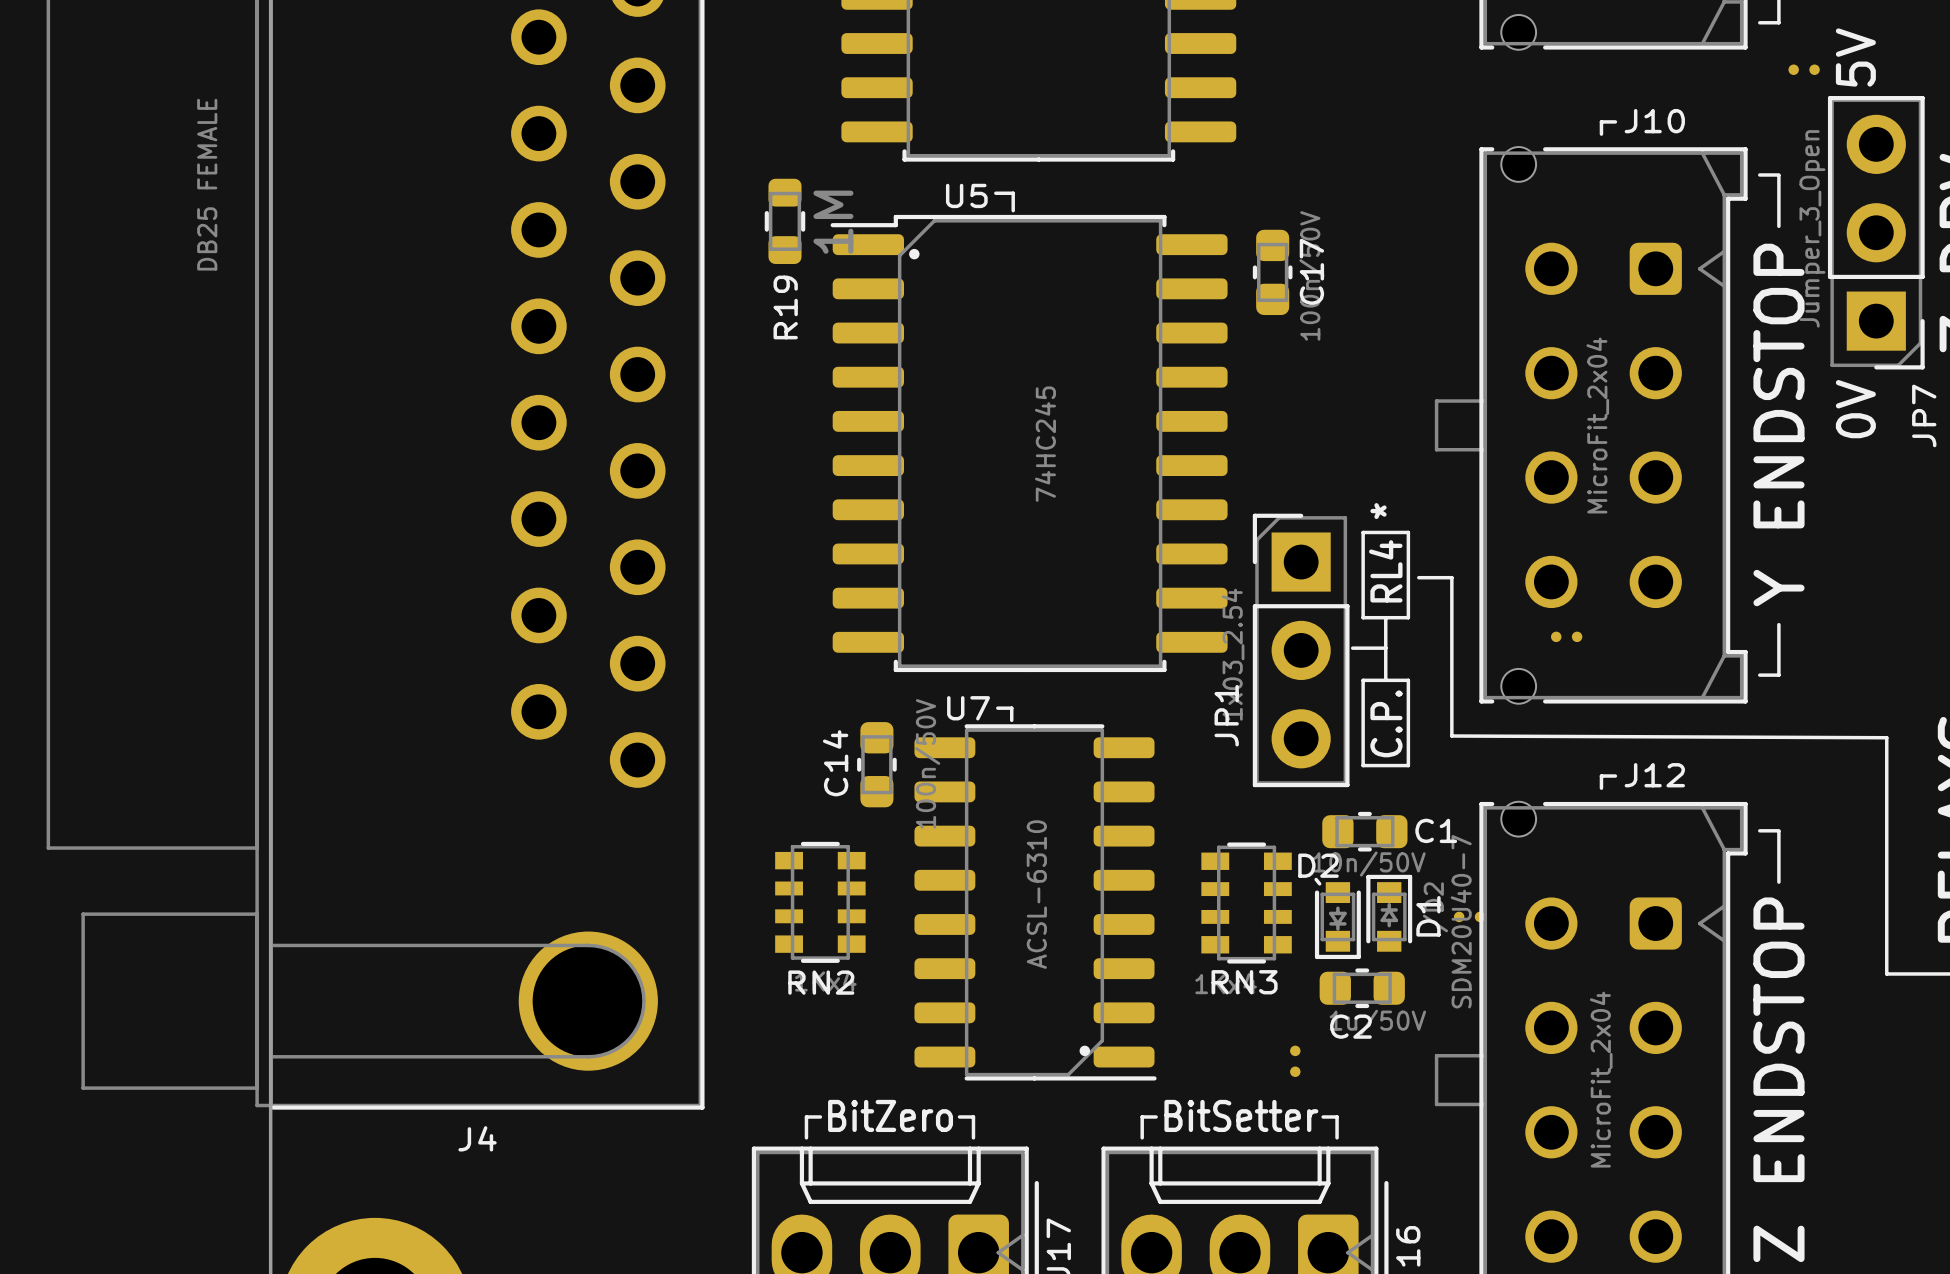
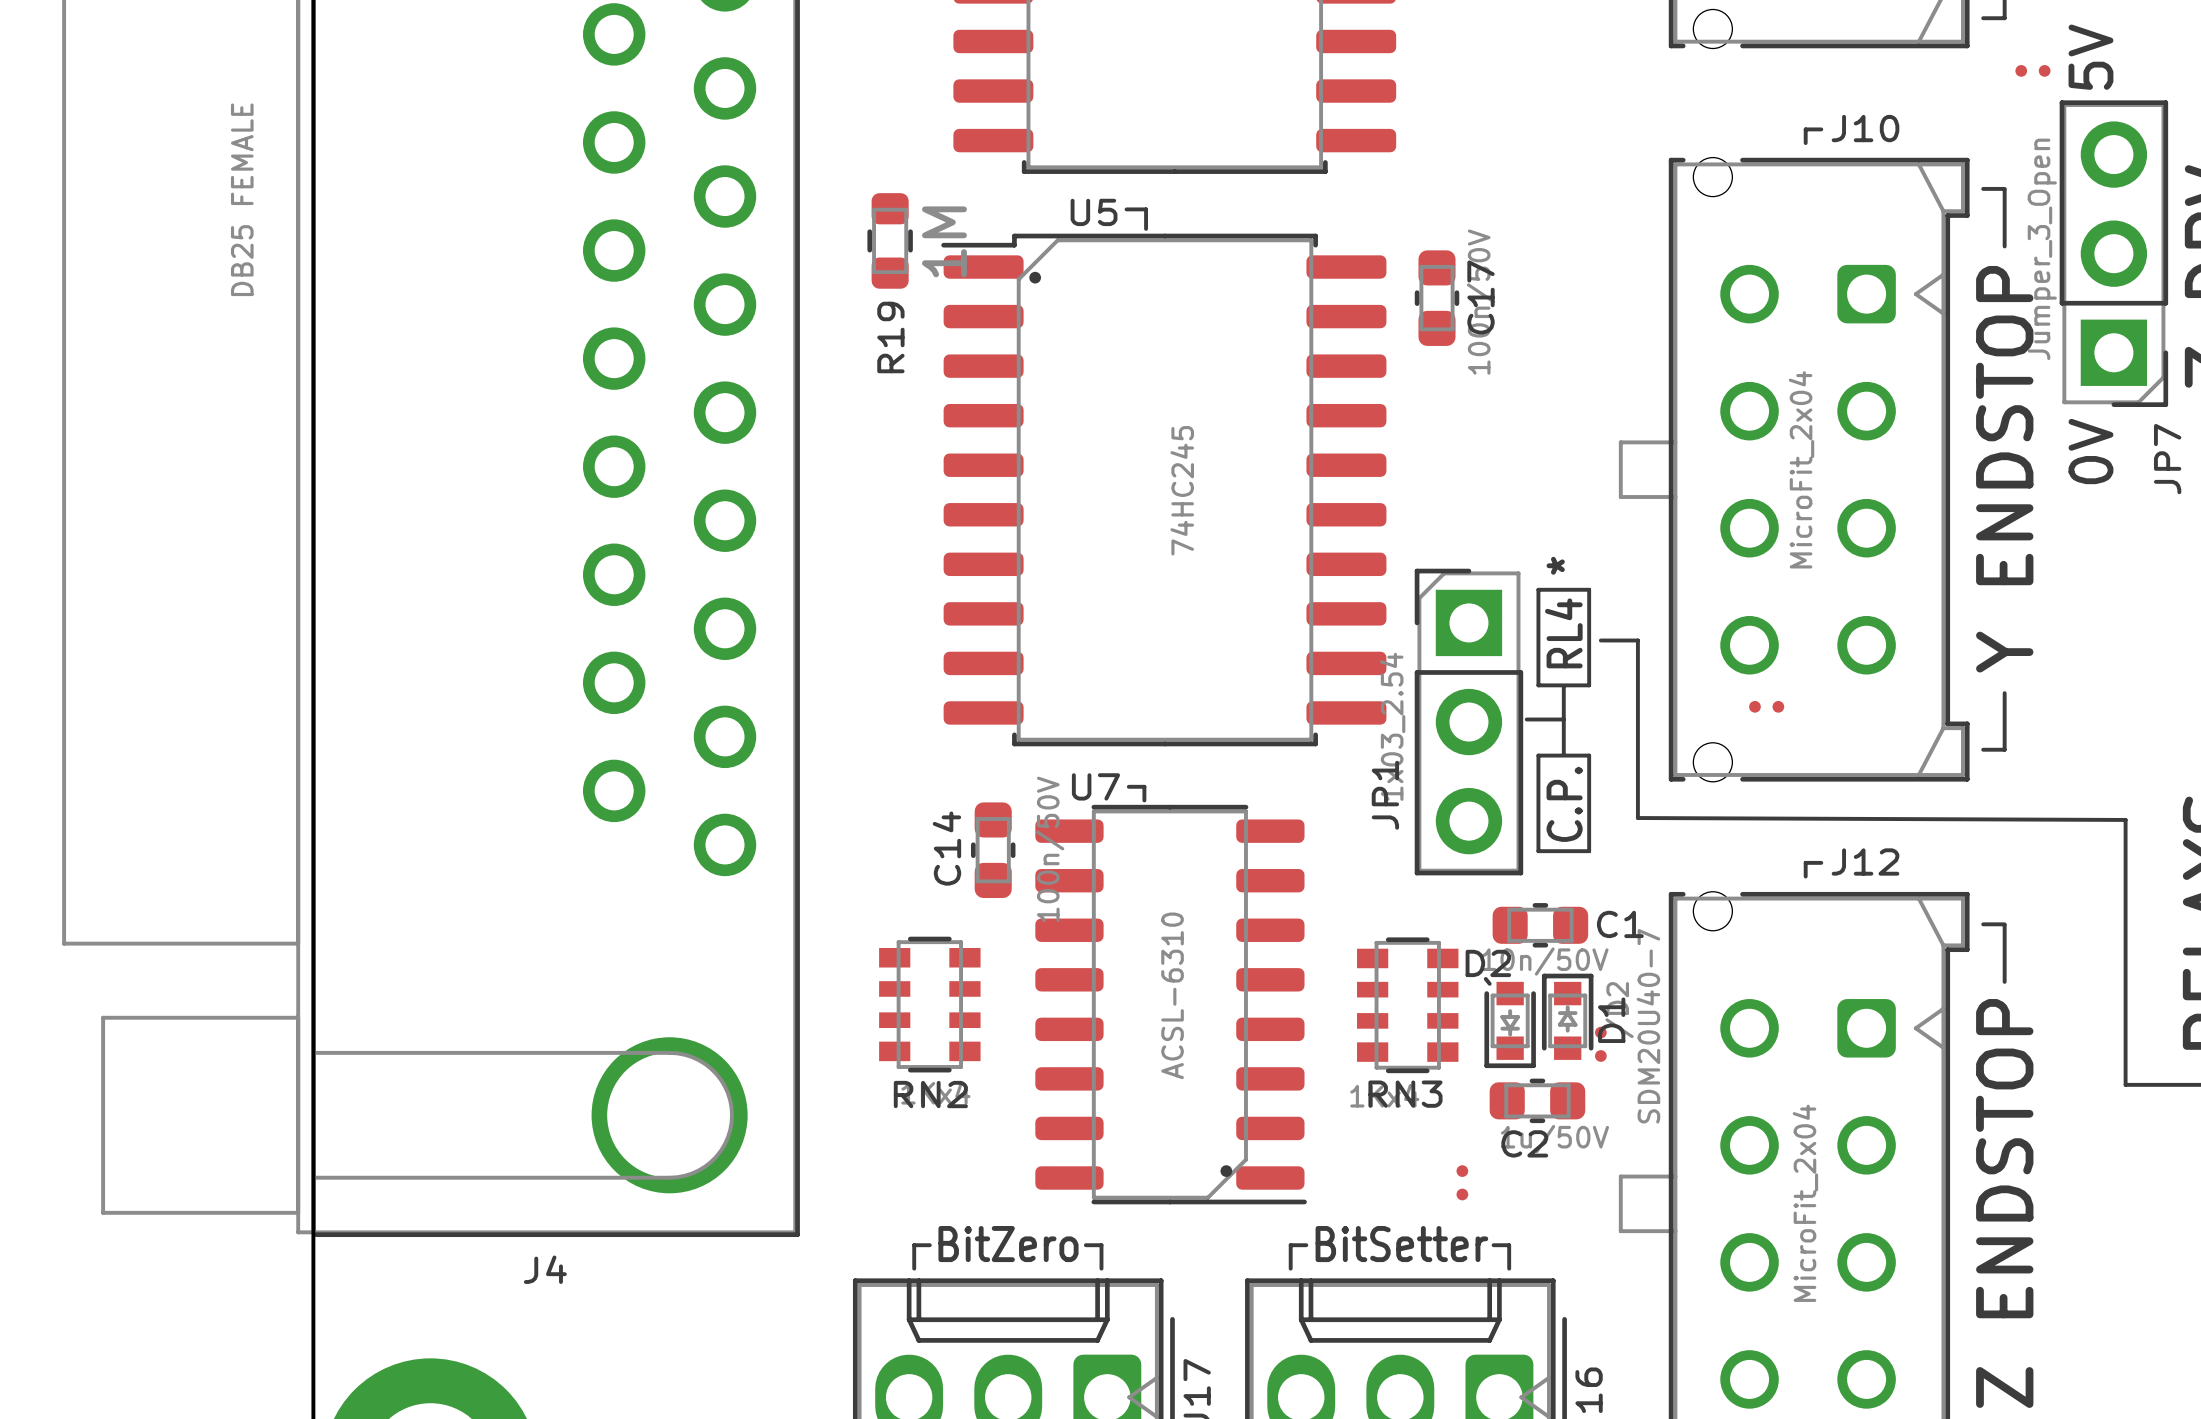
part rotation: 0° (1469, 916) -> 90° clockwise (1600, 1044)
part position: (1469, 916) -> (1600, 1044)

